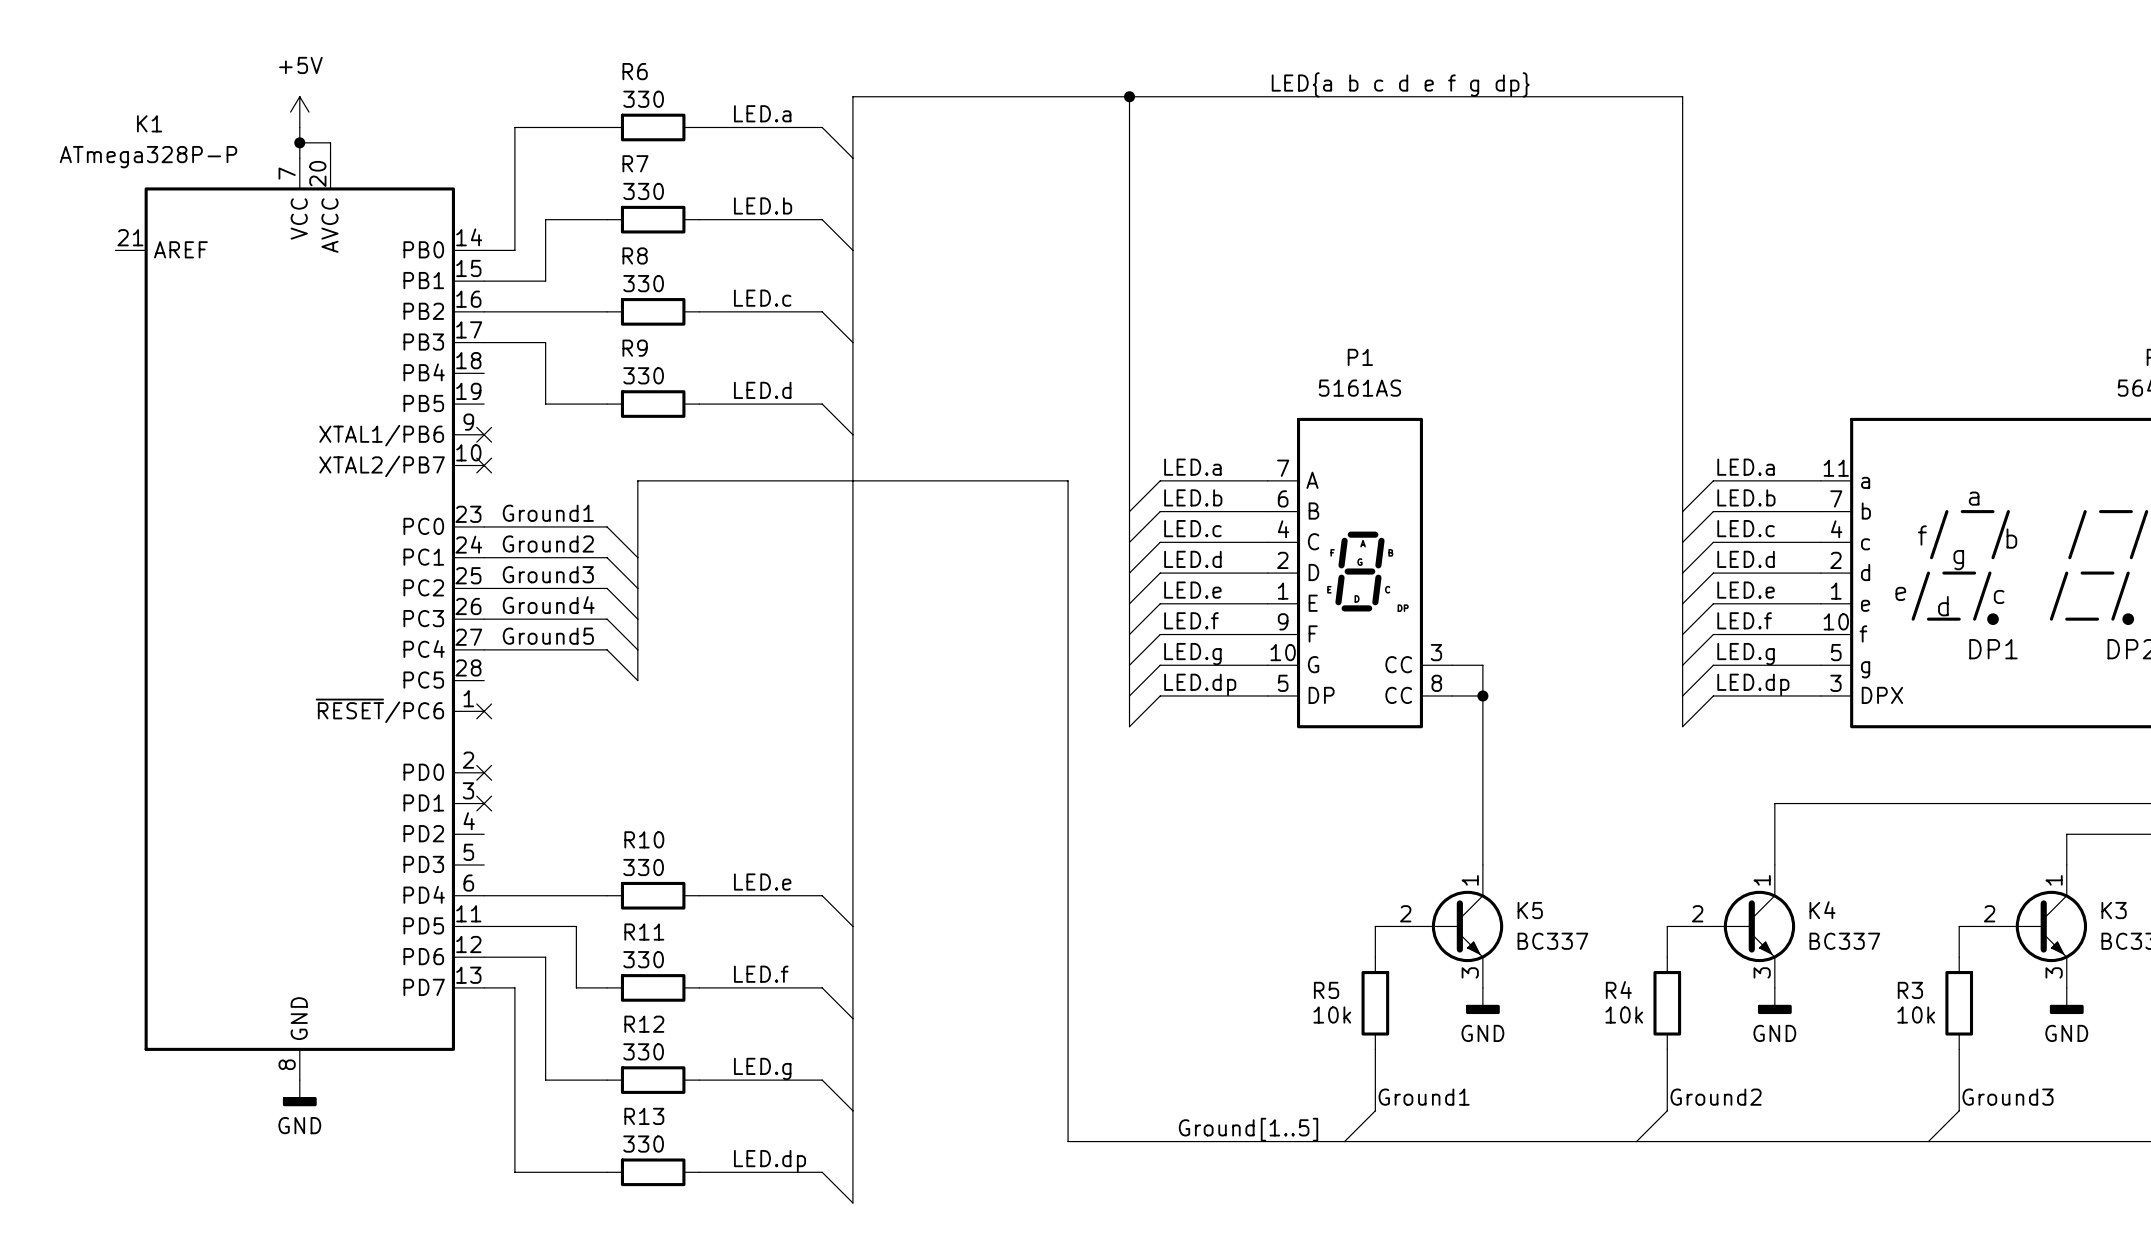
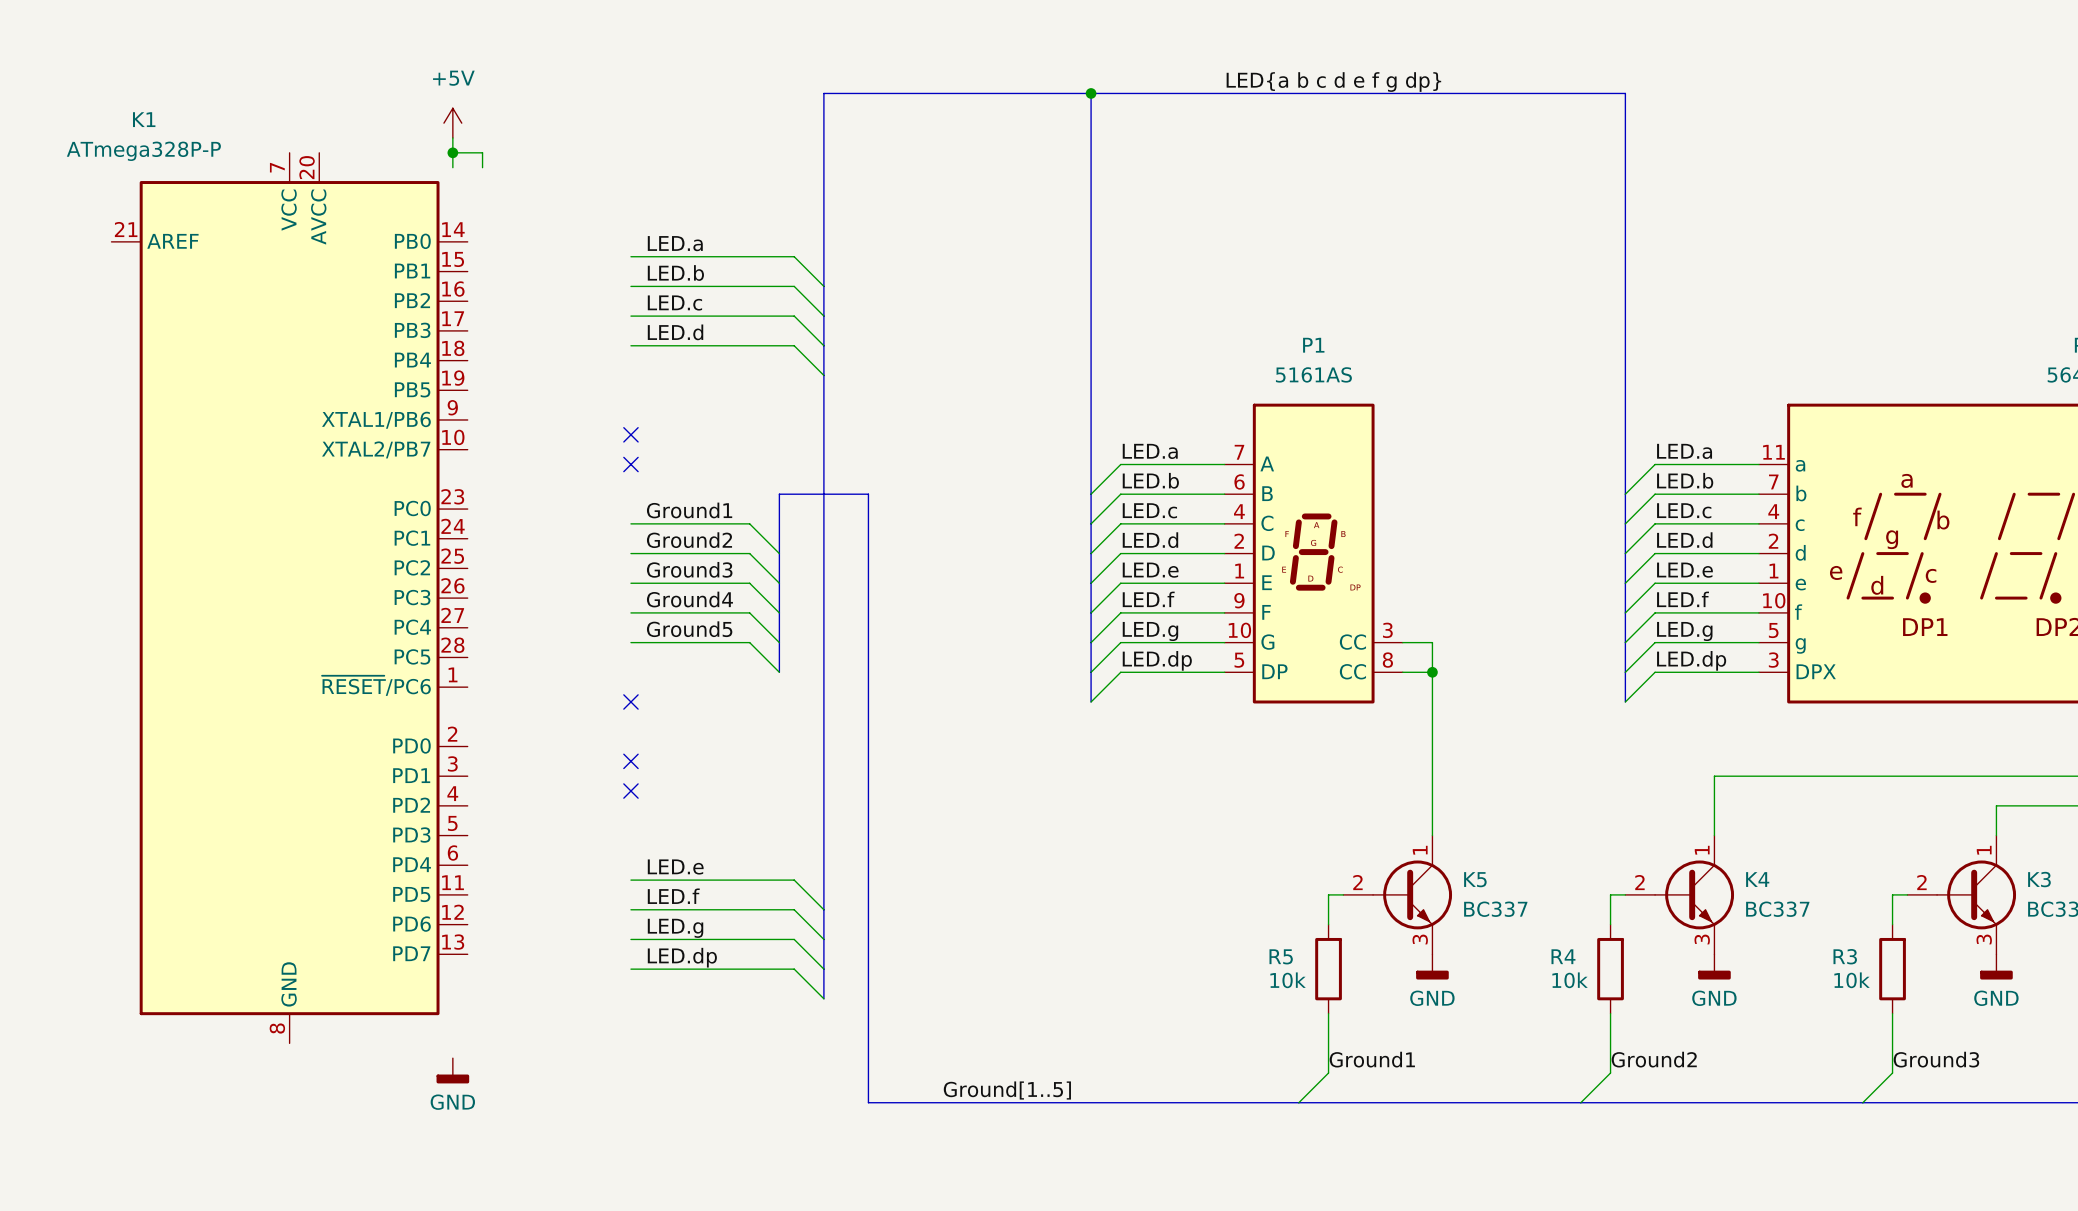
power symbol position: +5V (299, 112) -> +5V (452, 123)
label position: LED.a (762, 113) -> LED.a (675, 243)
wire: (299, 127) (299, 158) -> (452, 137) (452, 167)
wire: (607, 127) (514, 127) (514, 250) (484, 250) -> none
R6: 330 (653, 127) -> none
wire: (699, 127) (822, 127) (852, 158) -> none
wire: (299, 142) (330, 142) (330, 158) -> (452, 152) (482, 152) (482, 167)
junction: (299, 142) -> none
junction: none -> (452, 152)
label position: LED.b (763, 205) -> LED.b (675, 272)
wire: (607, 219) (545, 219) (545, 281) (484, 281) -> none
R7: 330 (653, 219) -> none
wire: (699, 219) (822, 219) (852, 250) -> none
wire: none -> (630, 256) (794, 256) (823, 286)
wire: none -> (630, 286) (794, 286) (823, 316)
label position: LED.c (762, 298) -> LED.c (674, 302)
wire: (484, 311) (607, 311) -> none
R8: 330 (653, 311) -> none
wire: (699, 311) (822, 311) (852, 342) -> none
wire: none -> (630, 316) (794, 316) (823, 345)
wire: (484, 342) (545, 342) (545, 404) (607, 404) -> none
wire: none -> (630, 345) (794, 345) (823, 375)
label position: LED.d (762, 390) -> LED.d (675, 332)
R9: 330 (653, 404) -> none
wire: (699, 404) (822, 404) (852, 434) -> none
no-connect mark: (484, 434) -> none
no-connect mark: none -> (630, 434)
no-connect mark: (484, 465) -> none
no-connect mark: none -> (630, 464)
label position: Ground1 (548, 513) -> Ground1 (689, 510)
wire: (484, 526) (607, 526) (637, 557) -> (630, 523) (749, 523) (779, 553)
label position: Ground2 (548, 543) -> Ground2 (689, 540)
wire: (484, 557) (607, 557) (637, 588) -> (630, 553) (749, 553) (779, 583)
label position: Ground3 (548, 574) -> Ground3 (689, 569)
wire: (484, 588) (607, 588) (637, 619) -> (630, 583) (749, 583) (779, 612)
label position: Ground4 (548, 605) -> Ground4 (689, 599)
wire: (484, 619) (607, 619) (637, 649) -> (630, 612) (749, 612) (779, 642)
label position: Ground5 (548, 636) -> Ground5 (689, 629)
wire: (484, 649) (607, 649) (637, 680) -> (630, 642) (749, 642) (779, 672)
bus: (637, 680) (637, 480) (1068, 480) (1068, 1141) -> (779, 672) (779, 494) (868, 494) (868, 1102) (1031, 1102)
no-connect mark: (484, 711) -> none
no-connect mark: none -> (630, 701)
no-connect mark: (484, 772) -> none
no-connect mark: none -> (630, 761)
no-connect mark: (484, 803) -> none
no-connect mark: none -> (630, 791)
label position: LED.e (762, 882) -> LED.e (675, 866)
wire: (484, 895) (607, 895) -> none
R10: 330 (653, 895) -> none
wire: (699, 895) (822, 895) (852, 926) -> none
wire: none -> (630, 880) (794, 880) (823, 909)
wire: (484, 926) (576, 926) (576, 987) (607, 987) -> none
wire: none -> (630, 909) (794, 909) (823, 939)
wire: (484, 957) (545, 957) (545, 1080) (607, 1080) -> none
wire: none -> (630, 939) (794, 939) (823, 969)
label position: LED.f (761, 974) -> LED.f (673, 896)
wire: (484, 987) (514, 987) (514, 1172) (607, 1172) -> none
R11: 330 (653, 987) -> none
wire: (699, 987) (822, 987) (852, 1018) -> none
wire: none -> (630, 969) (794, 969) (823, 998)
bus: (852, 1034) (852, 1203) -> none
label position: LED.g (762, 1068) -> LED.g (675, 928)
R12: 330 (653, 1080) -> none
wire: (699, 1080) (822, 1080) (852, 1110) -> none
power symbol position: GND (299, 1093) -> GND (452, 1070)
label position: Ground[1..5] (1248, 1129) -> Ground[1..5] (1007, 1090)
label position: LED.dp (770, 1161) -> LED.dp (682, 957)
R13: 330 (653, 1172) -> none
wire: (699, 1172) (822, 1172) (852, 1203) -> none

